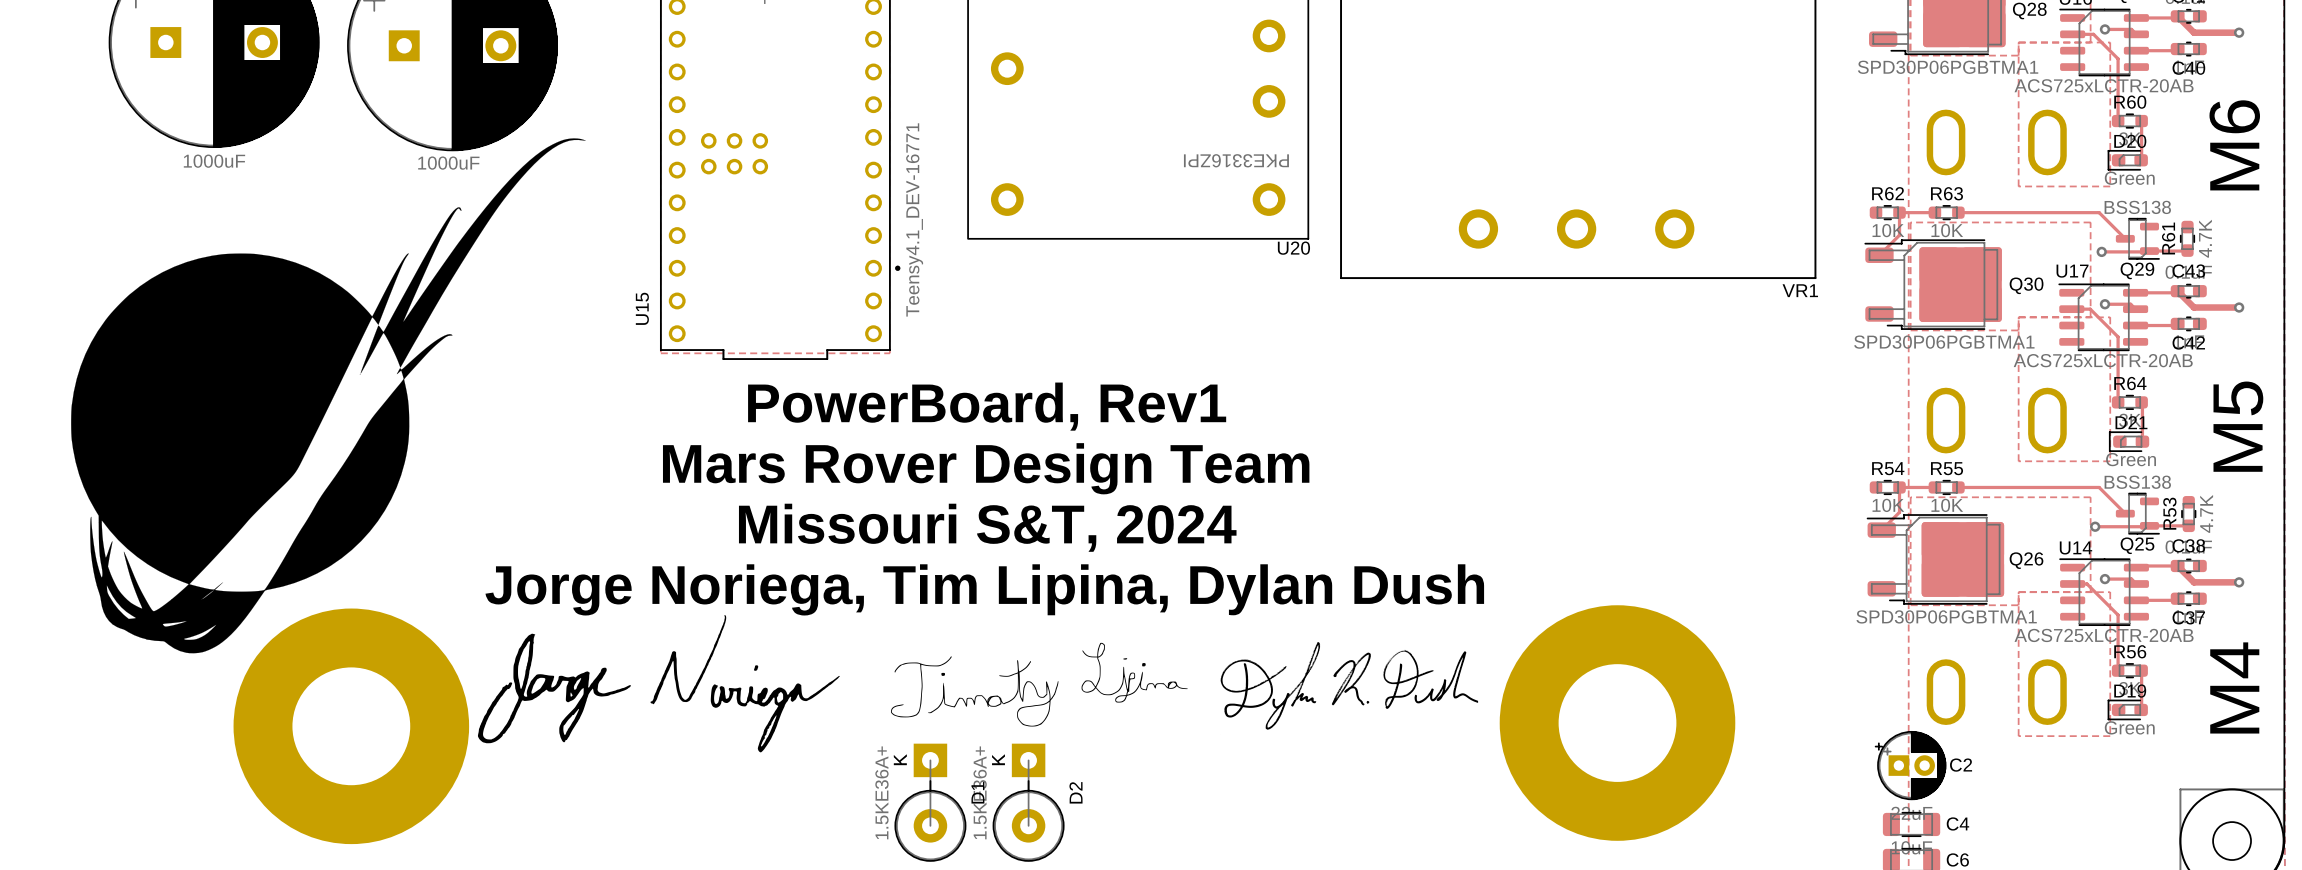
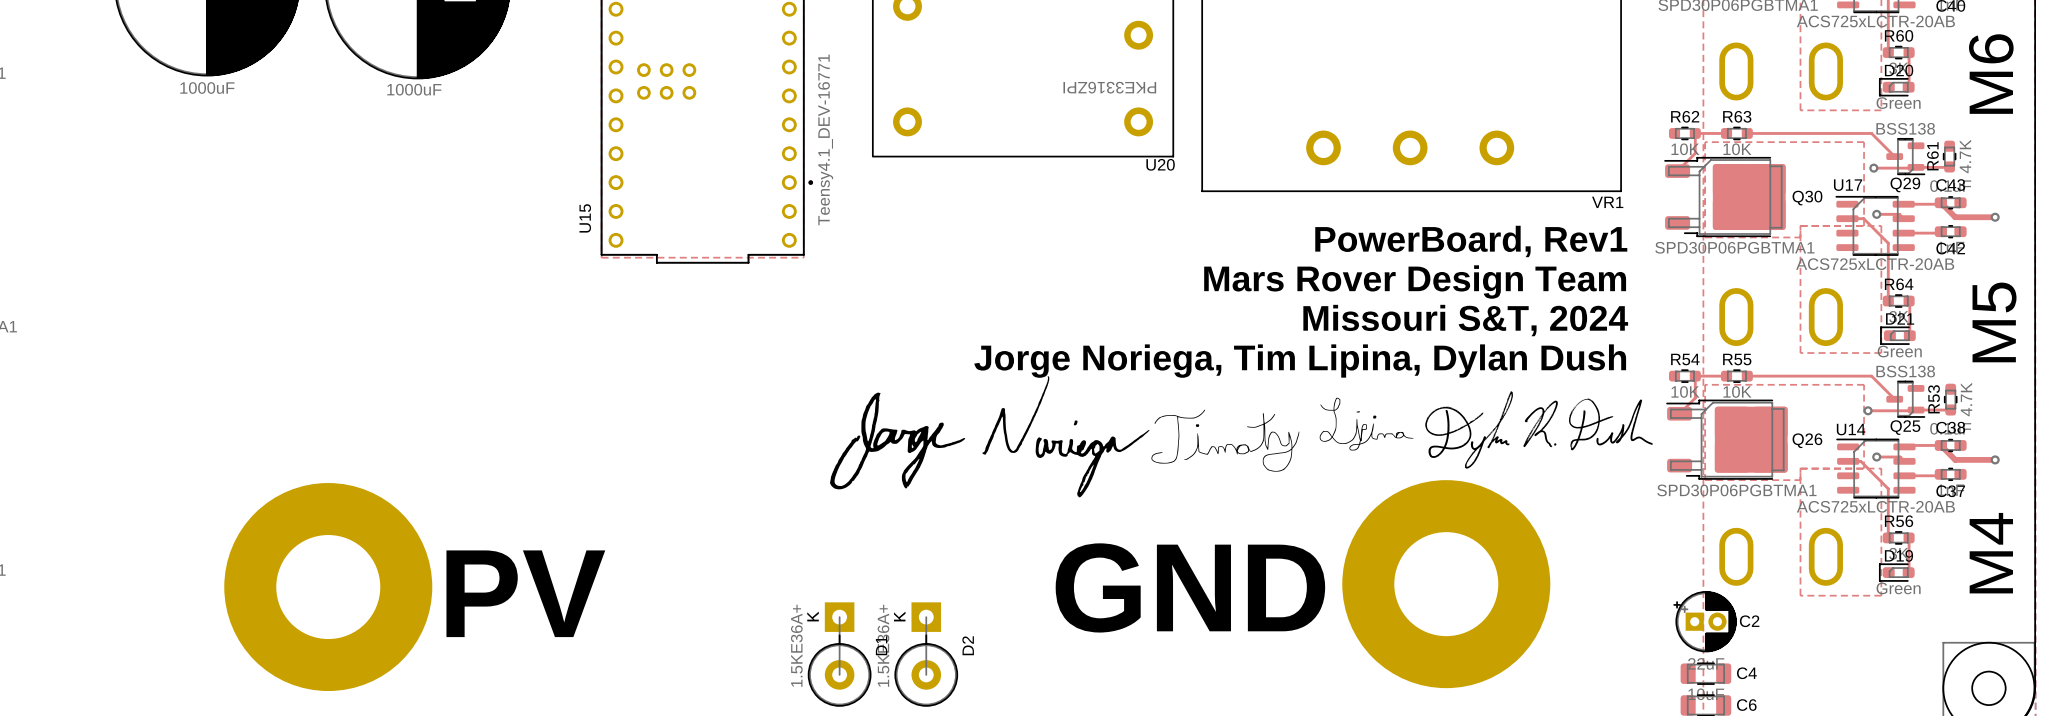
drawing: [71, 138, 840, 753] -> none
text: none -> PowerBoard, Rev1 (1471, 241)
text: none -> Mars Rover Design Team (1415, 282)
text: PowerBoard, Rev1 (987, 406) -> none
text: none -> Missouri S&T, 2024 (1465, 320)
text: Mars Rover Design Team (986, 468) -> none
text: none -> Jorge Noriega, Tim Lipina, Dylan Dush (1300, 361)
drawing: none -> [830, 376, 1653, 498]
text: Missouri S&T, 2024 (987, 527) -> none
text: Jorge Noriega, Tim Lipina, Dylan Dush (984, 589) -> none
drawing: [890, 642, 1188, 727] -> none
drawing: [1220, 642, 1479, 735] -> none
text: none -> GND (1190, 587)
text: none -> PV (525, 593)

